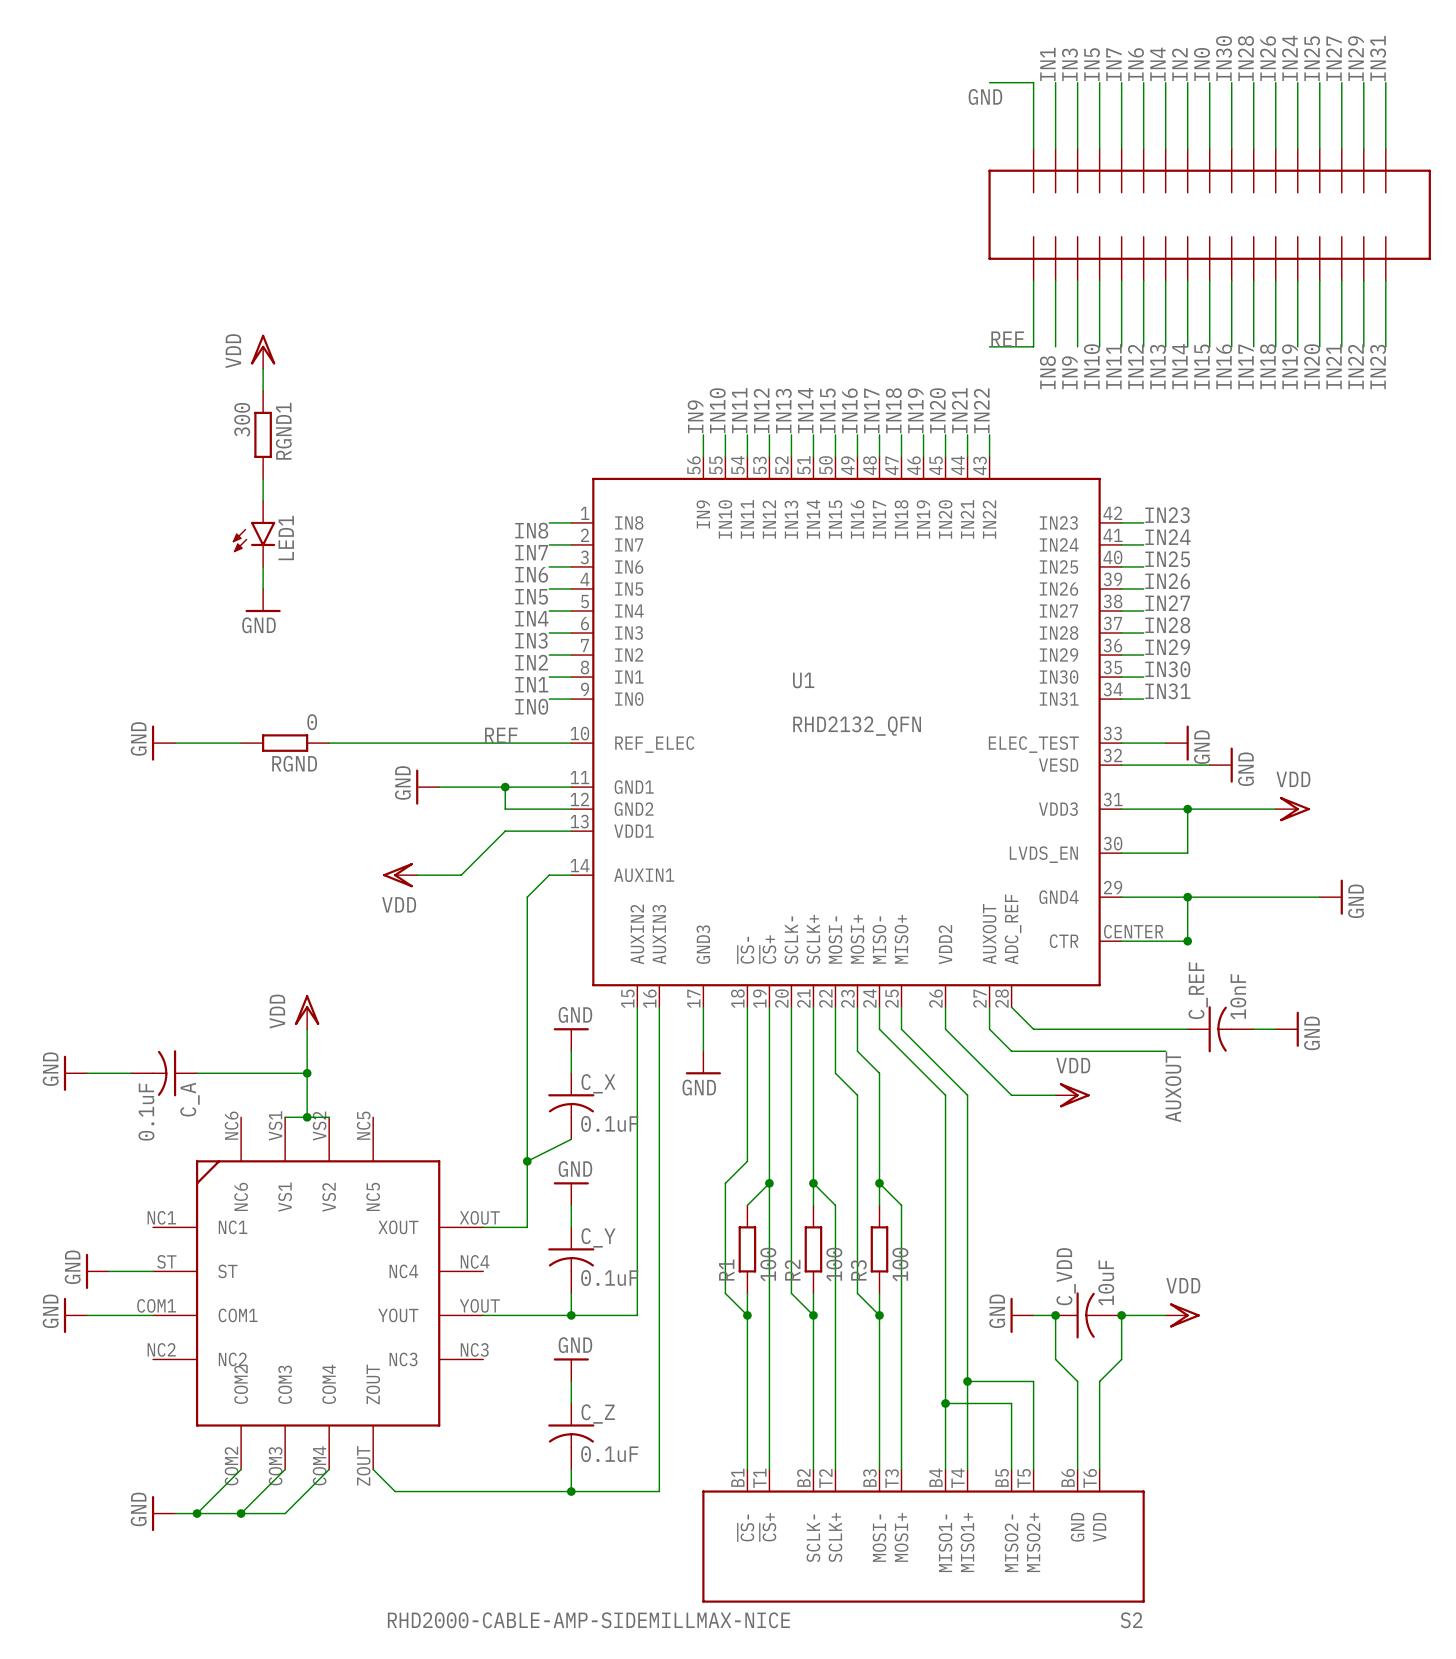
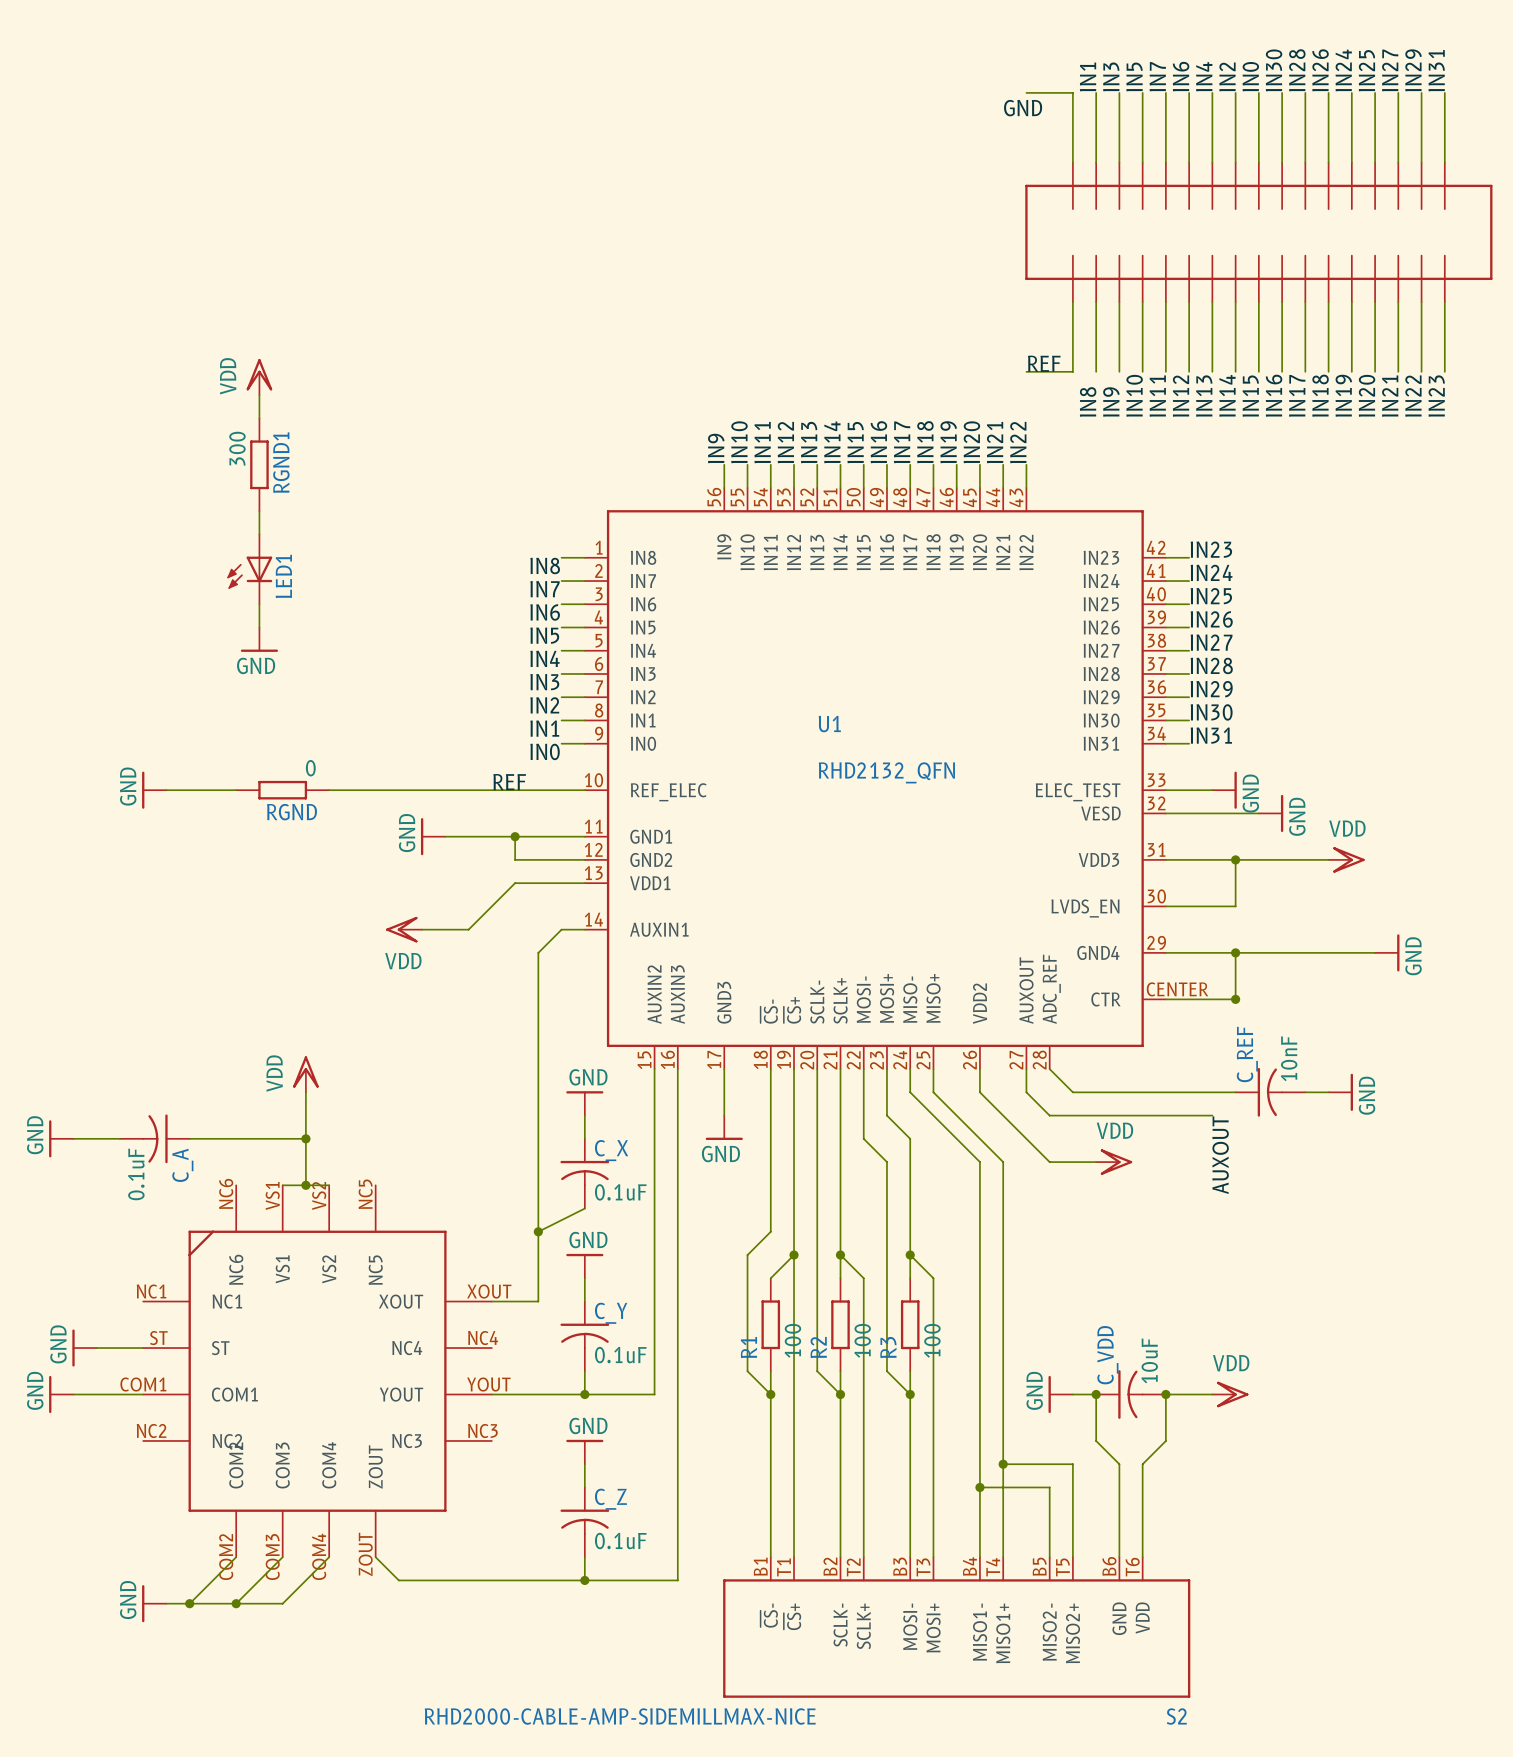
LED1 symbol: [232, 500, 276, 567] -> [227, 534, 273, 605]

